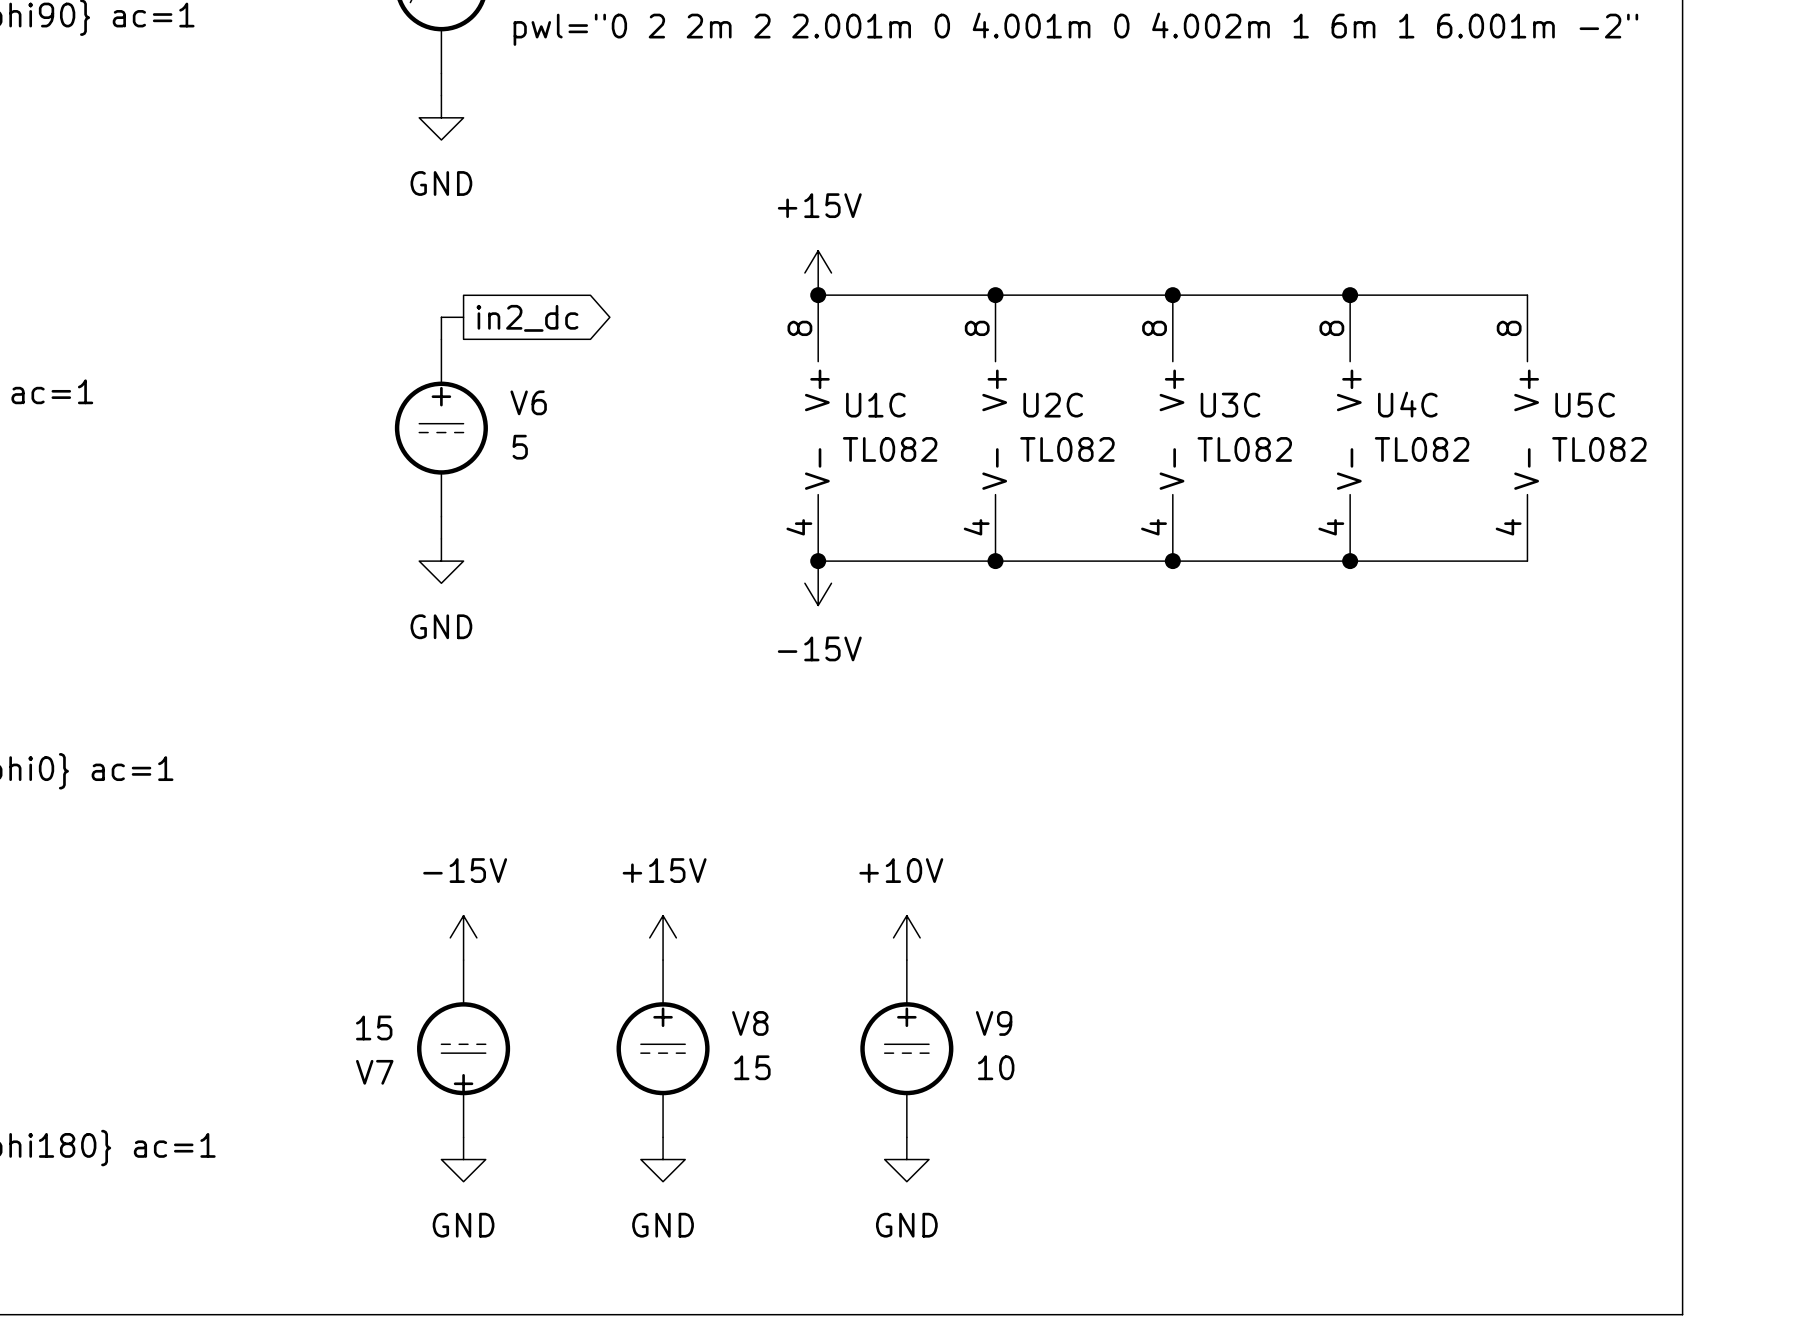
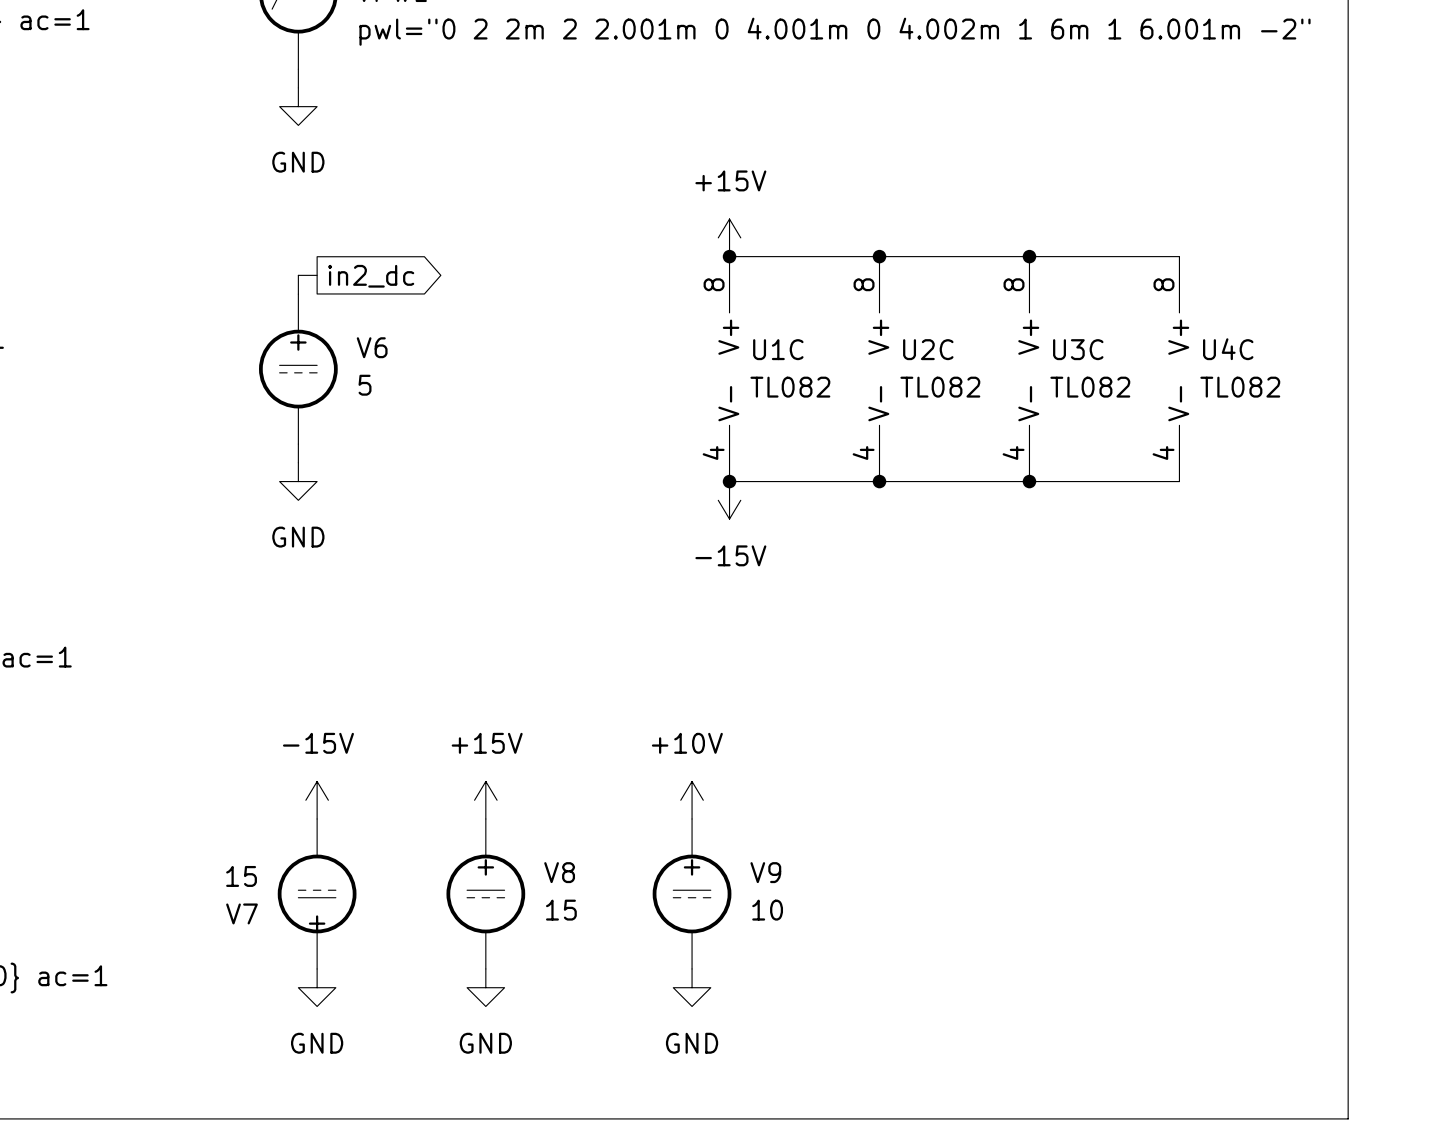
power symbol position: +15V (818, 272) -> +15V (729, 237)
wire: (818, 295) (951, 295) -> none
junction: (818, 295) -> none
junction position: (995, 295) -> (729, 256)
junction position: (1172, 295) -> (879, 256)
junction position: (1350, 295) -> (1029, 256)
wire: (1483, 295) (1527, 295) -> none
U1C position: (818, 428) -> (729, 369)
U2C position: (995, 428) -> (879, 369)
U3C position: (1172, 428) -> (1029, 369)
U4C position: (1350, 428) -> (1179, 369)
U5C: TL082 (1527, 428) -> none
wire: (818, 561) (951, 561) -> none
junction: (818, 561) -> none
junction position: (995, 561) -> (729, 481)
junction position: (1172, 561) -> (879, 481)
junction position: (1350, 561) -> (1029, 481)
wire: (1483, 561) (1527, 561) -> none
power symbol position: -15V (818, 583) -> -15V (729, 500)

